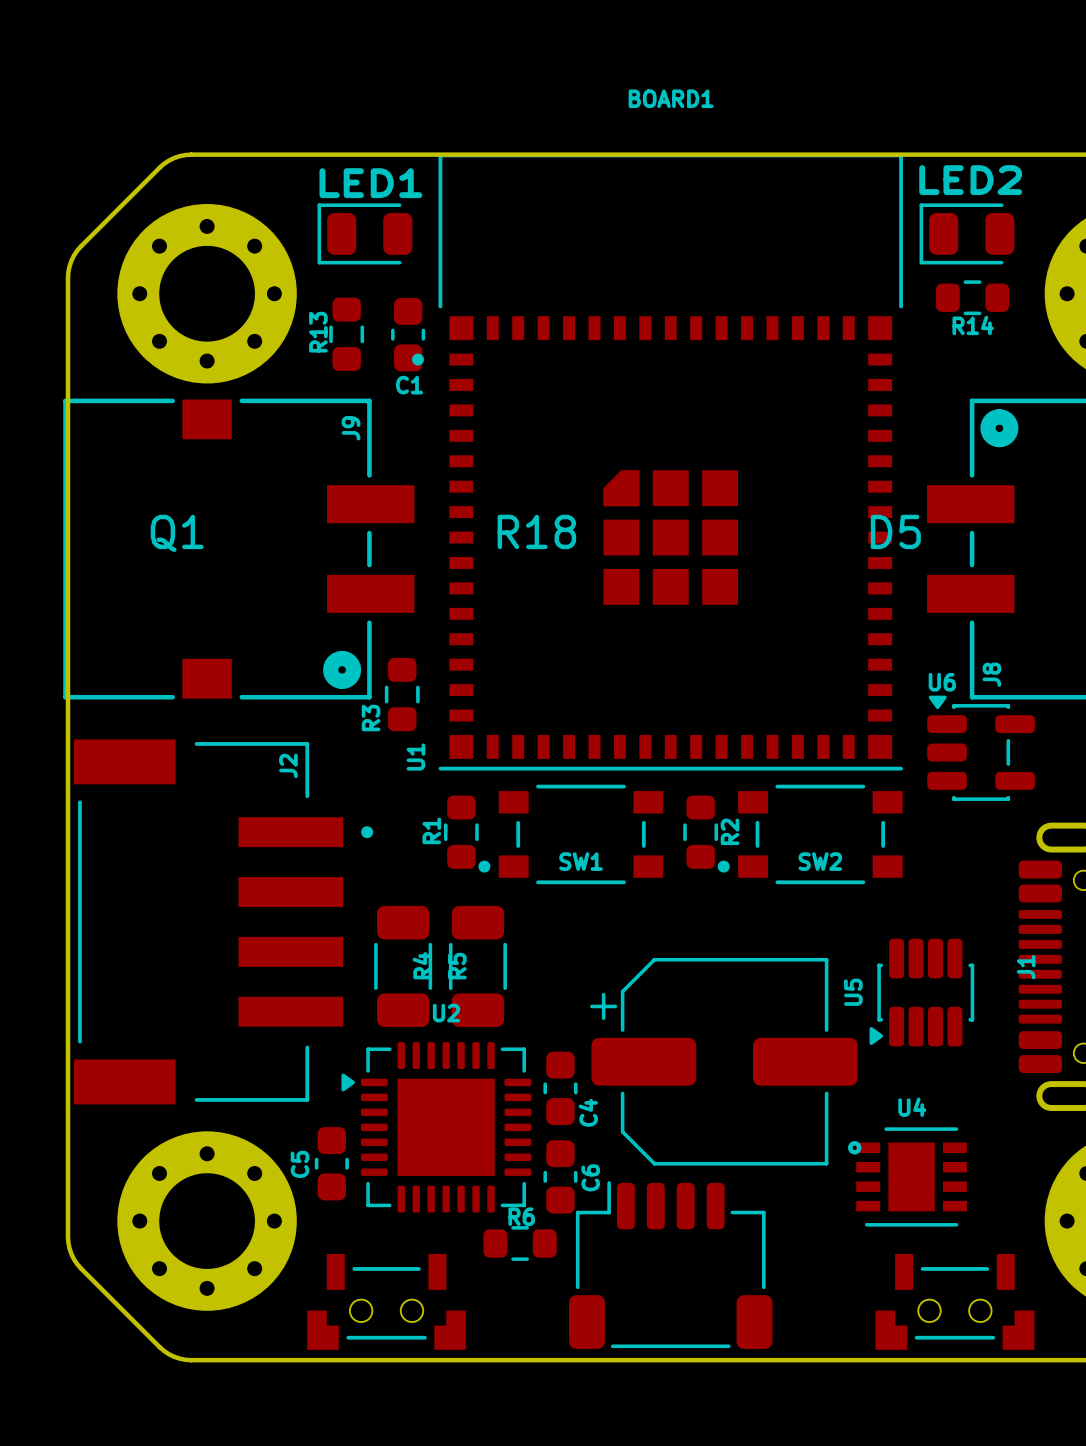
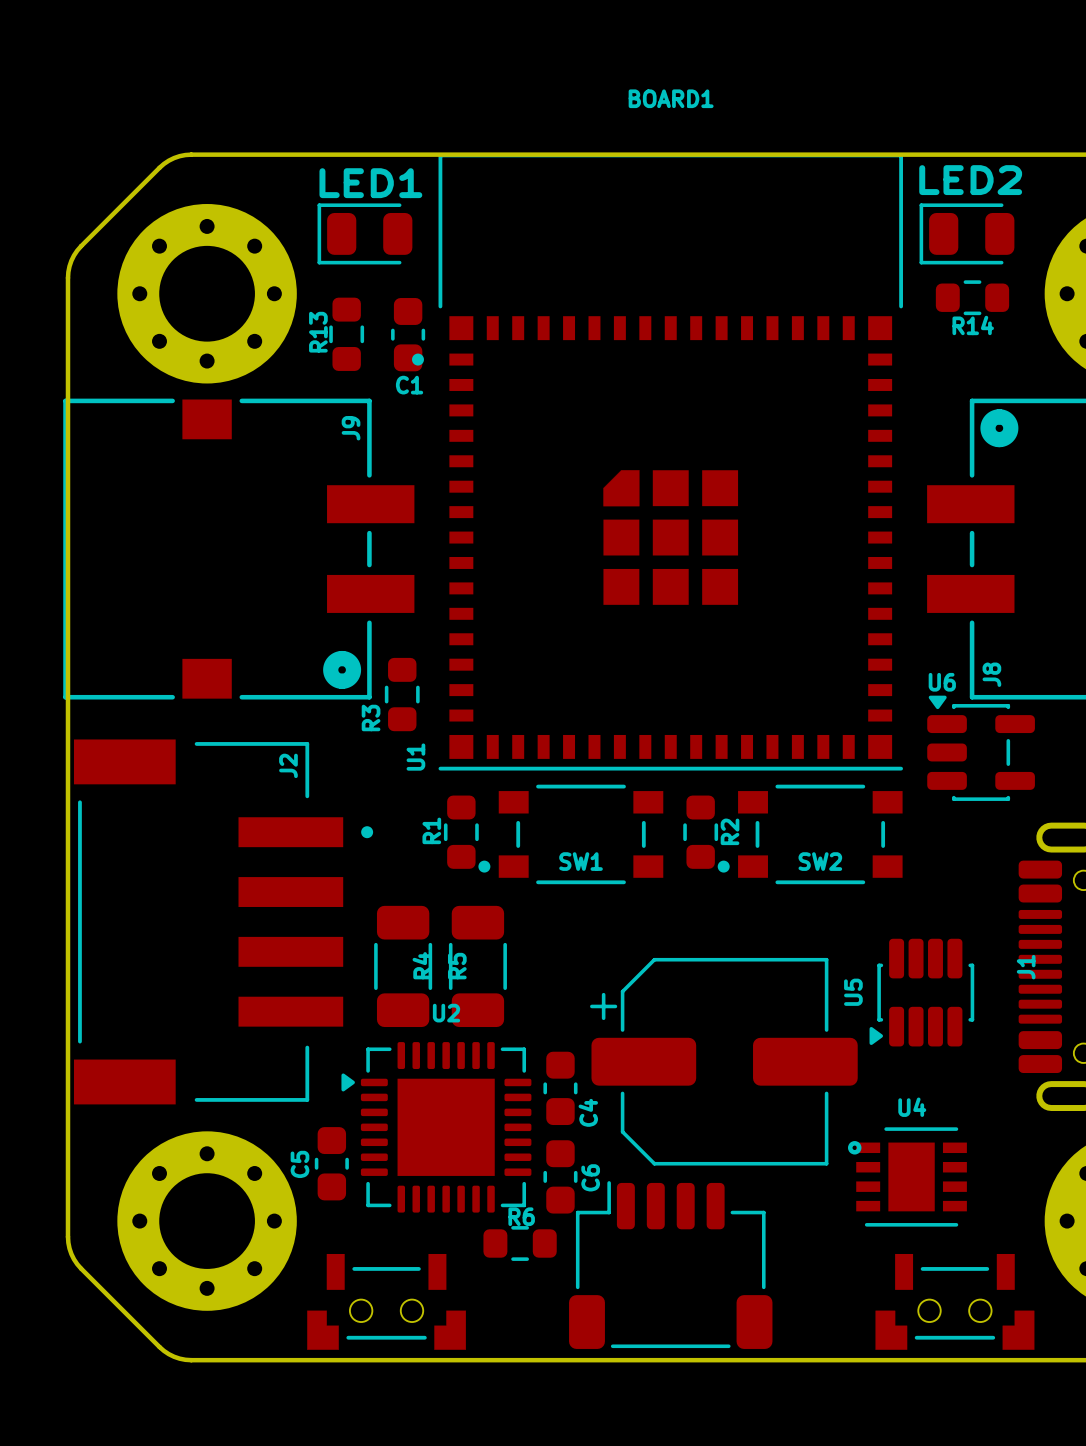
R18: (536, 531) -> none
D5: (895, 531) -> none
Q1: (177, 533) -> none

